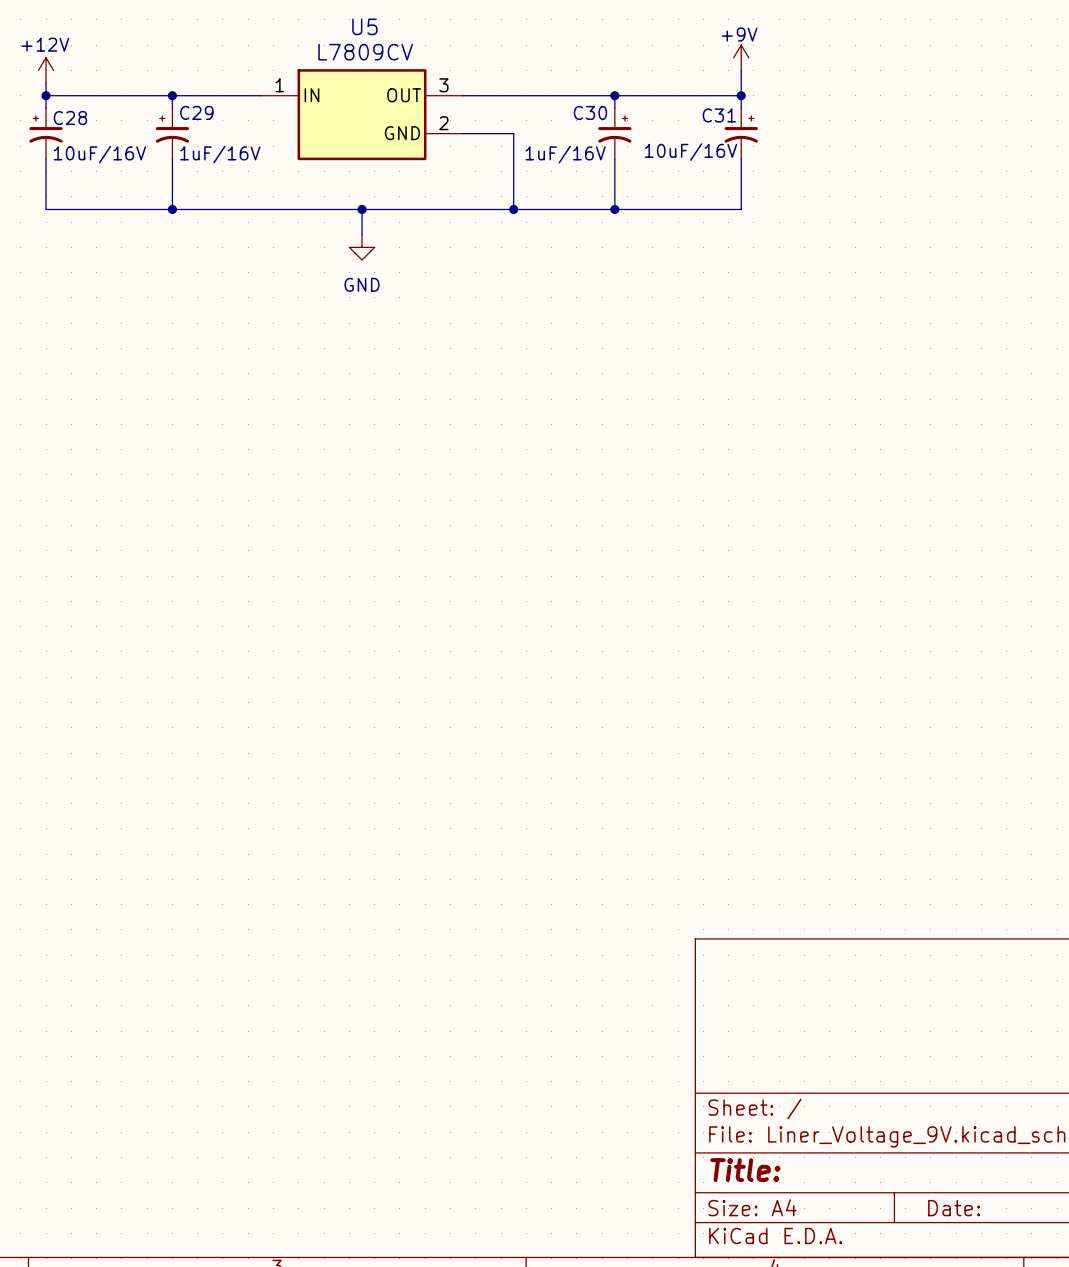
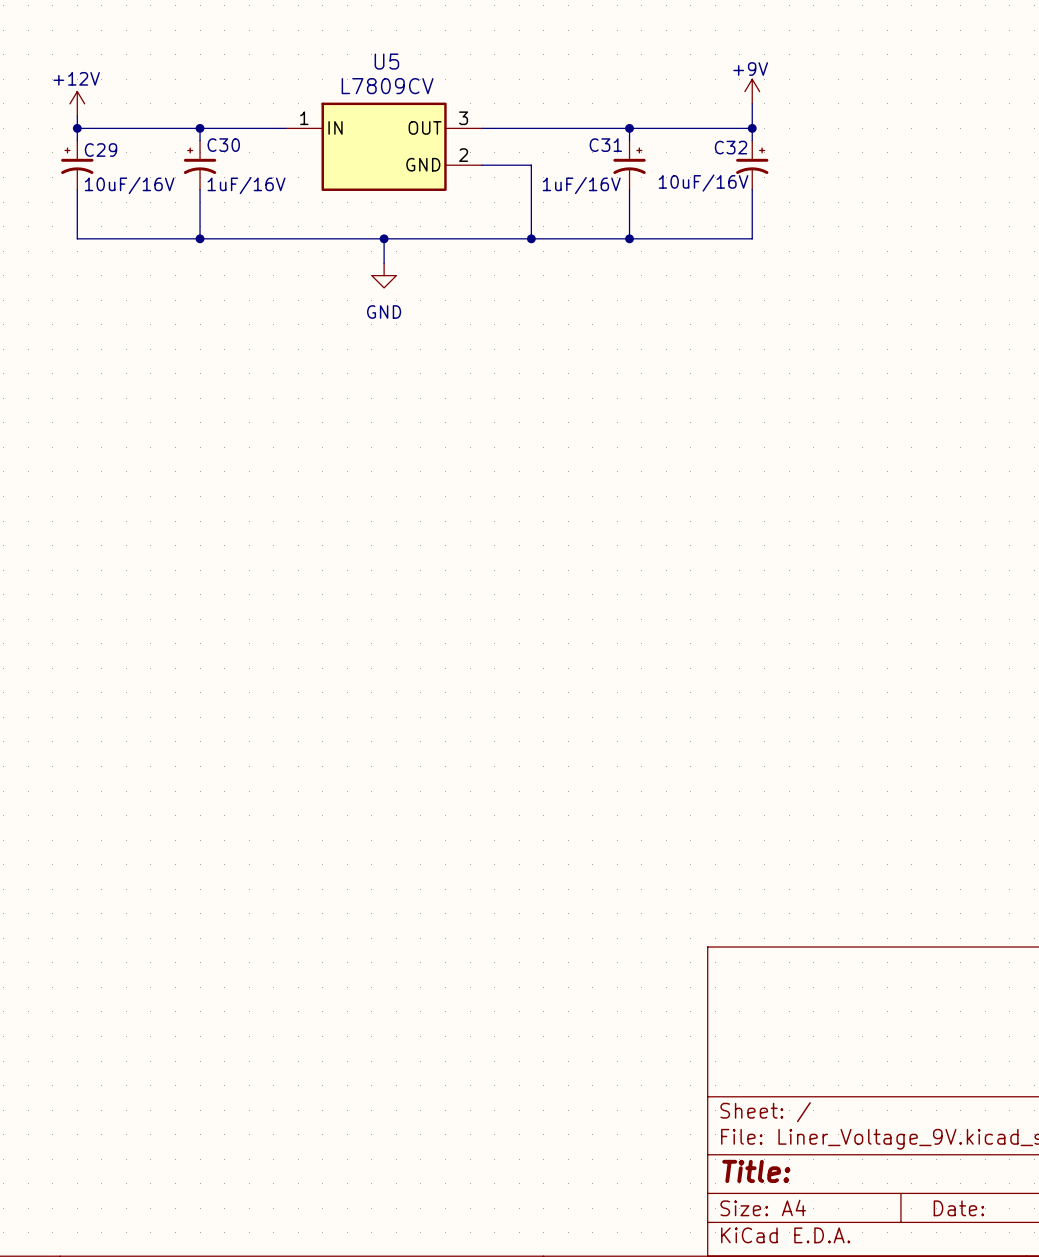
C29 name: C29 (196, 112) -> C30 (223, 145)
C30 name: C30 (590, 112) -> C31 (605, 145)
C31 name: C31 (719, 115) -> C32 (731, 147)
C28 name: C28 (70, 117) -> C29 (101, 150)

